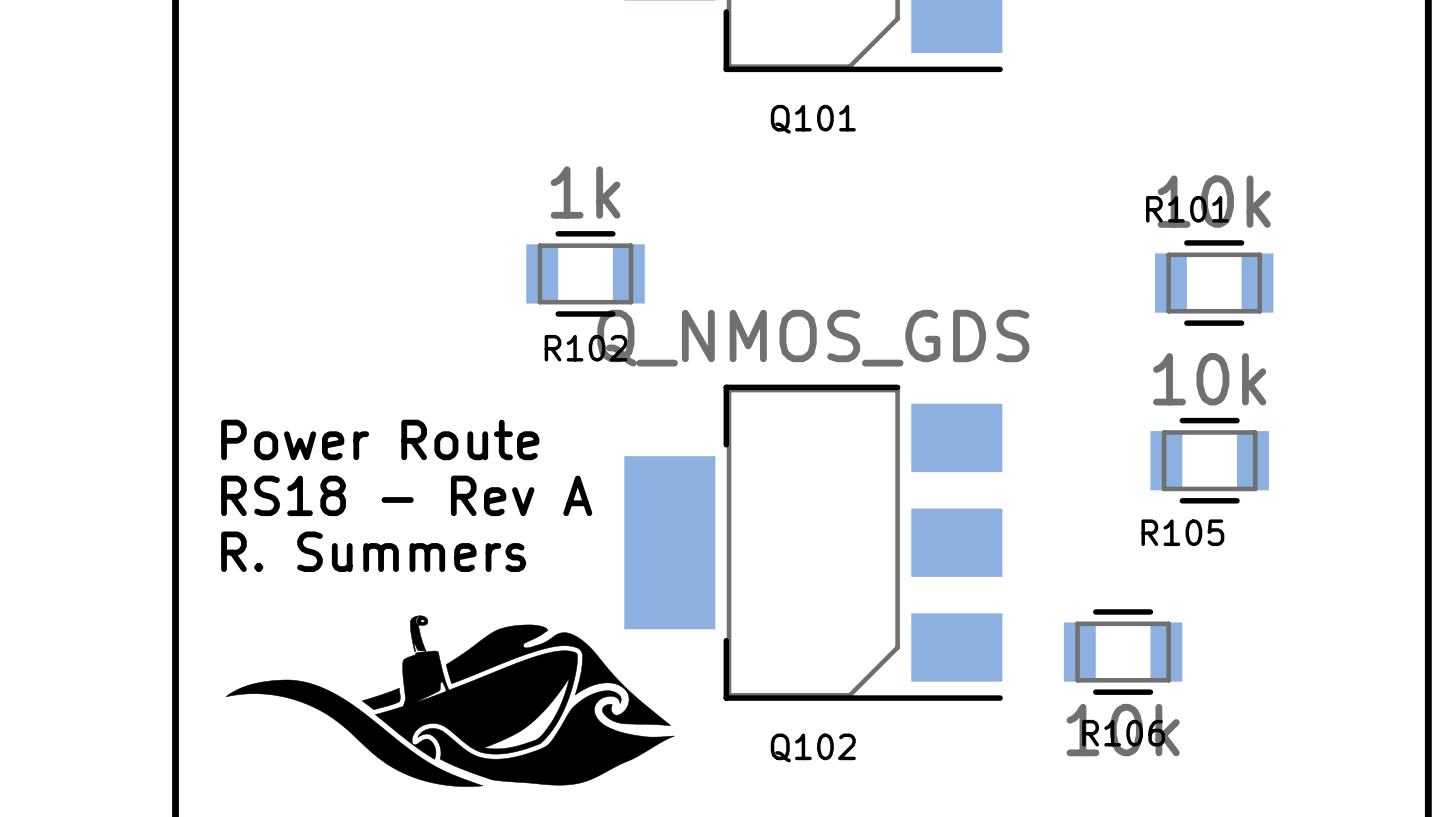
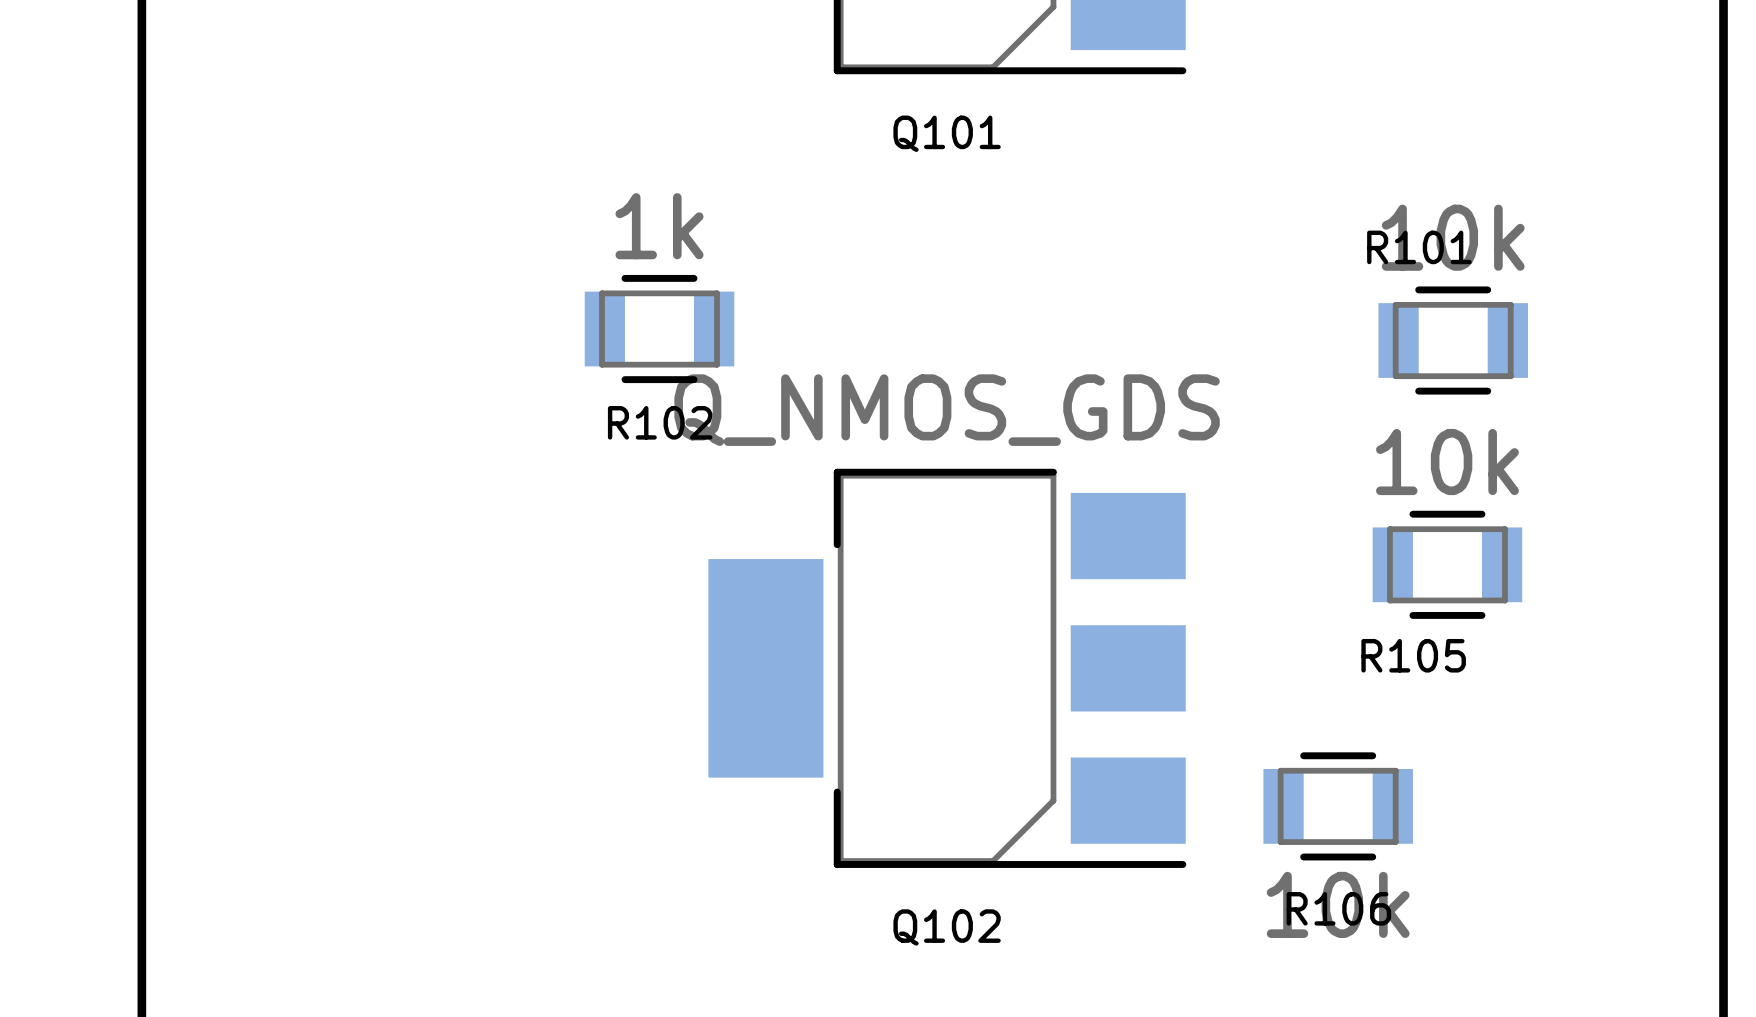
text: Power Route (380, 439) -> none
text: RS18 - Rev A (406, 495) -> none
text: R. Summers (373, 551) -> none
drawing: [226, 615, 675, 787] -> none

